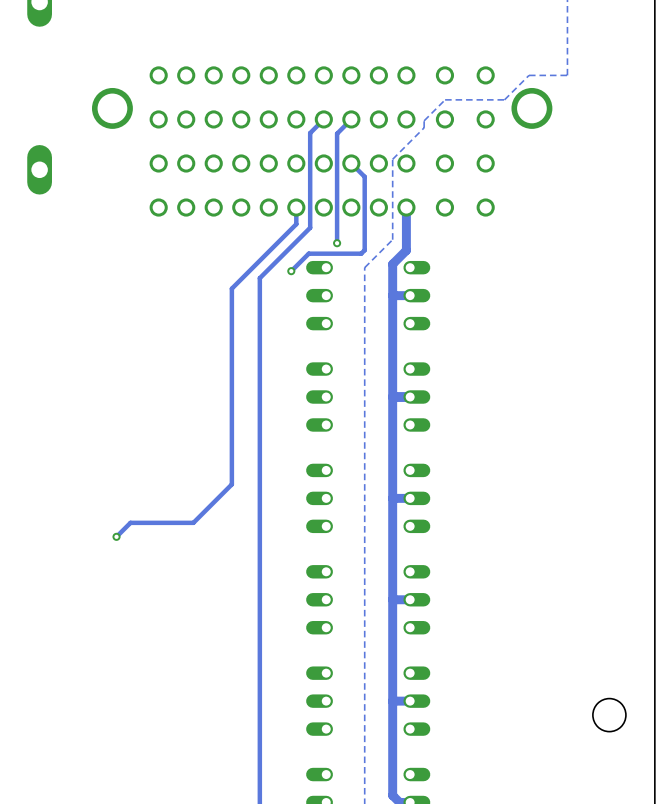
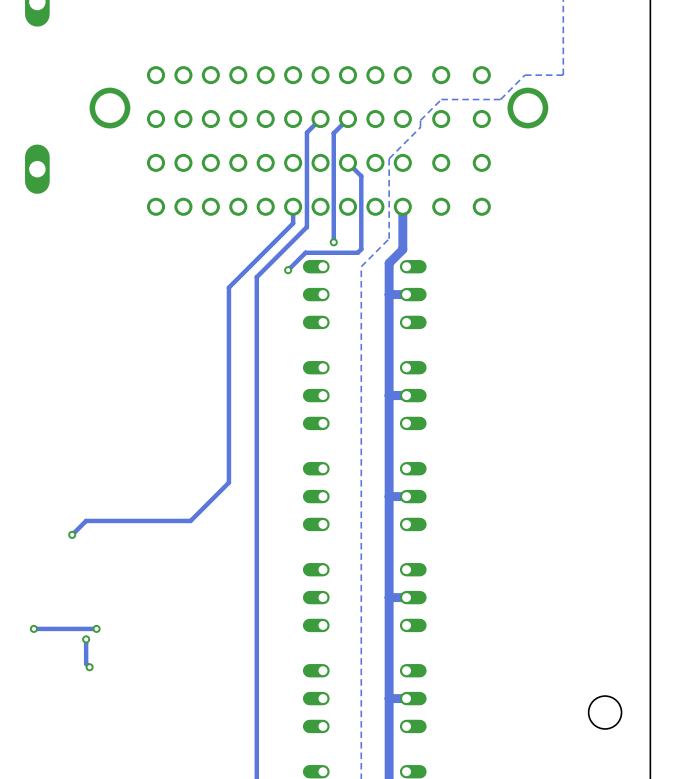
track: (130, 522) (116, 536) -> (127, 520) (86, 520) (72, 534)
via position: (116, 536) -> (72, 534)
via: none -> (33, 628)
track: none -> (96, 628) (33, 628)
via: none -> (96, 628)
track: none -> (86, 639) (86, 663) (89, 667)
via: none -> (86, 639)
via: none -> (89, 667)

